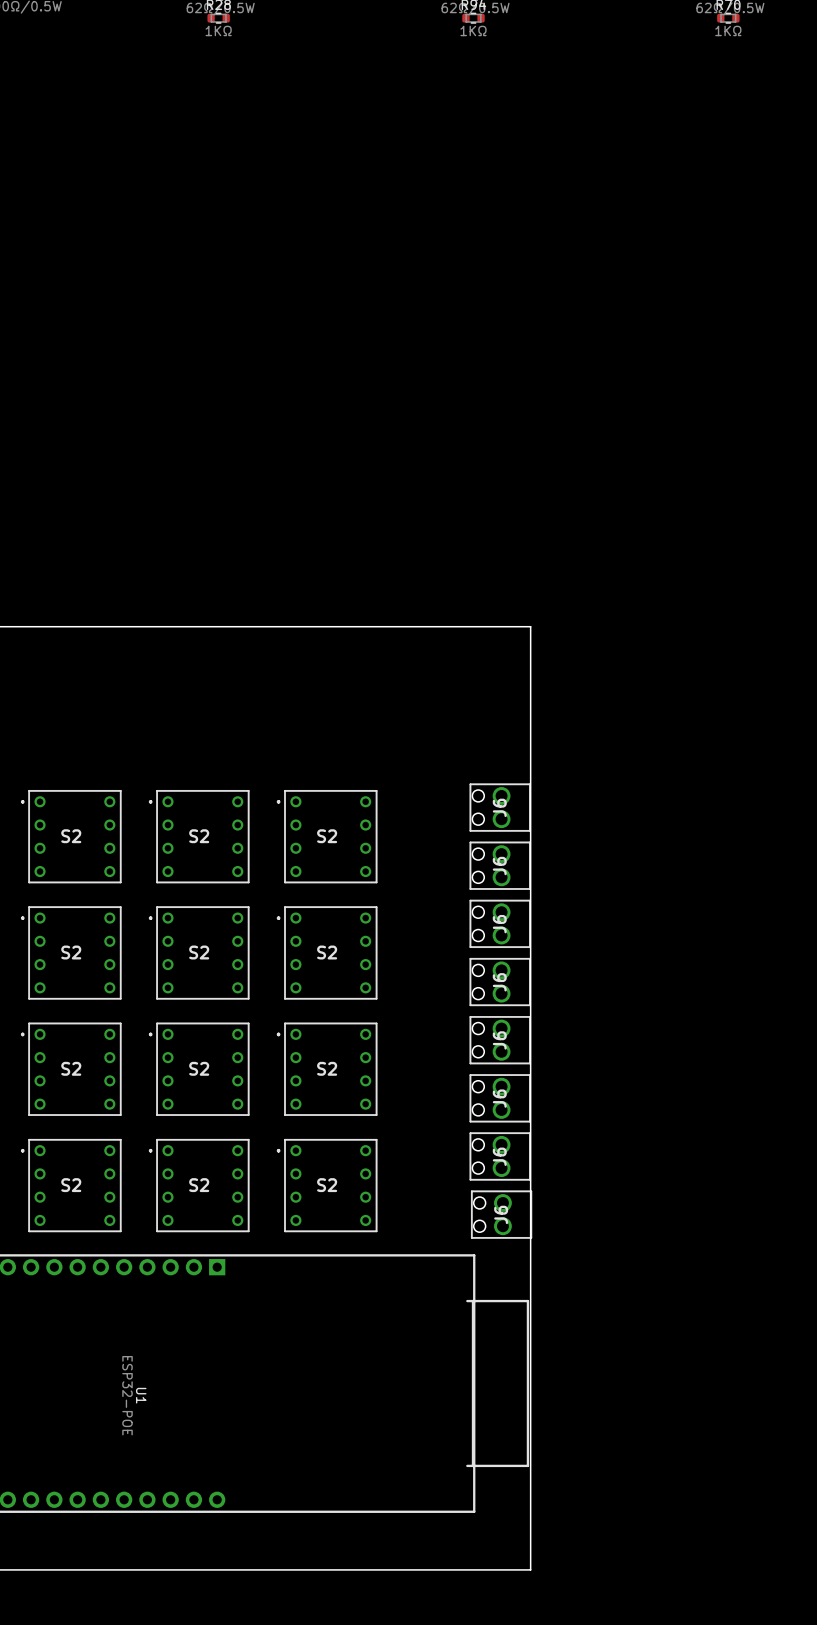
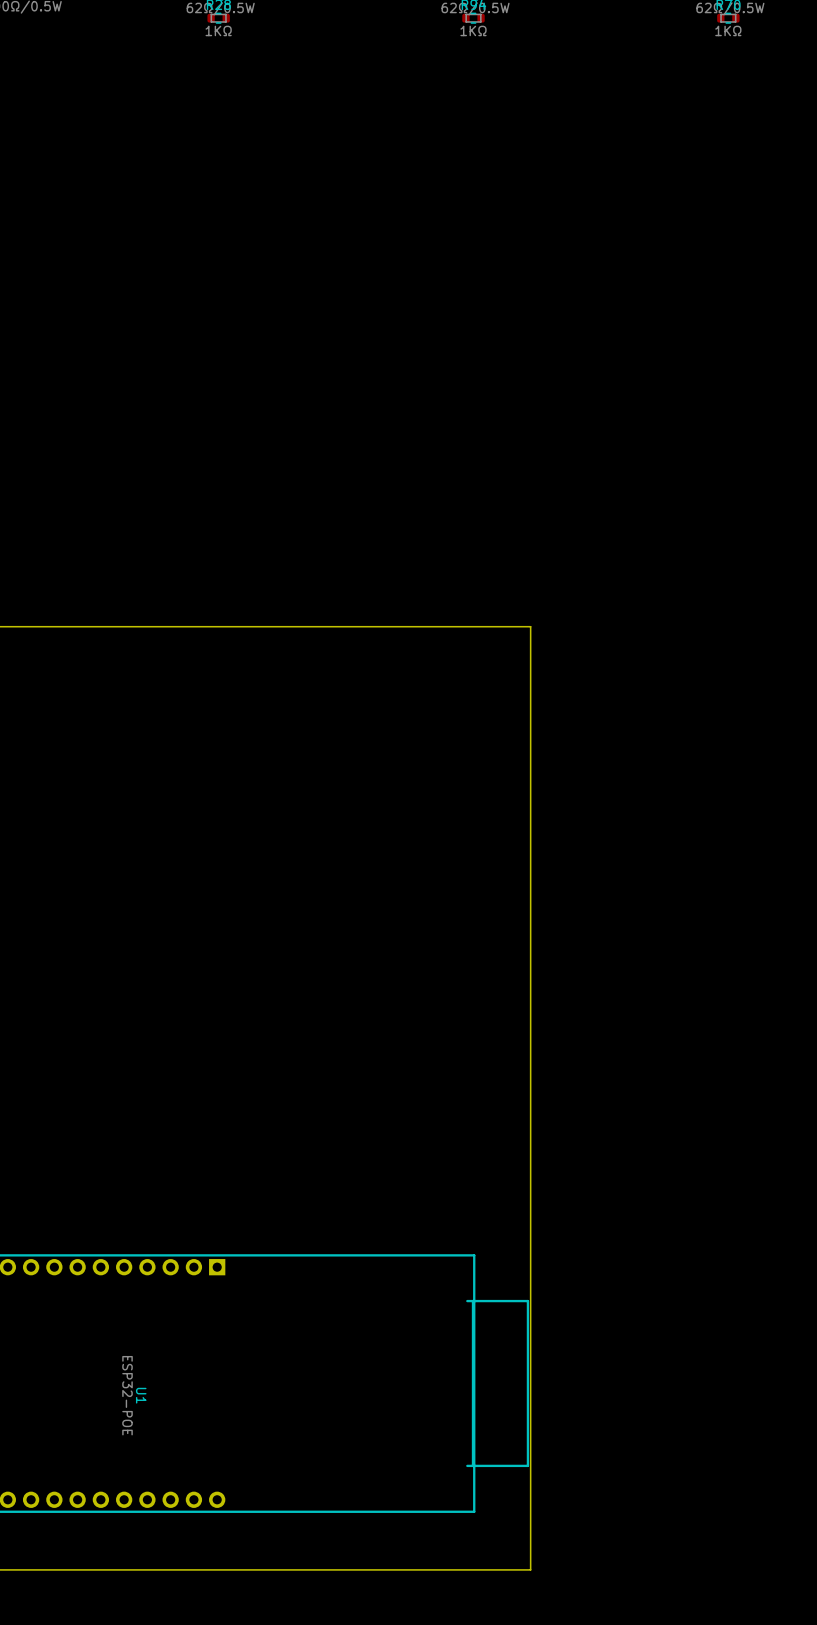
J6: (500, 807) -> none
S2: (71, 836) -> none
S2: (199, 836) -> none
S2: (327, 836) -> none
J6: (500, 865) -> none
J6: (500, 923) -> none
S2: (71, 952) -> none
S2: (199, 952) -> none
S2: (327, 952) -> none
J6: (500, 982) -> none
J6: (500, 1040) -> none
S2: (71, 1069) -> none
S2: (199, 1069) -> none
S2: (327, 1069) -> none
J6: (500, 1098) -> none
J6: (500, 1156) -> none
S2: (71, 1185) -> none
S2: (199, 1185) -> none
S2: (327, 1185) -> none
J6: (501, 1214) -> none

